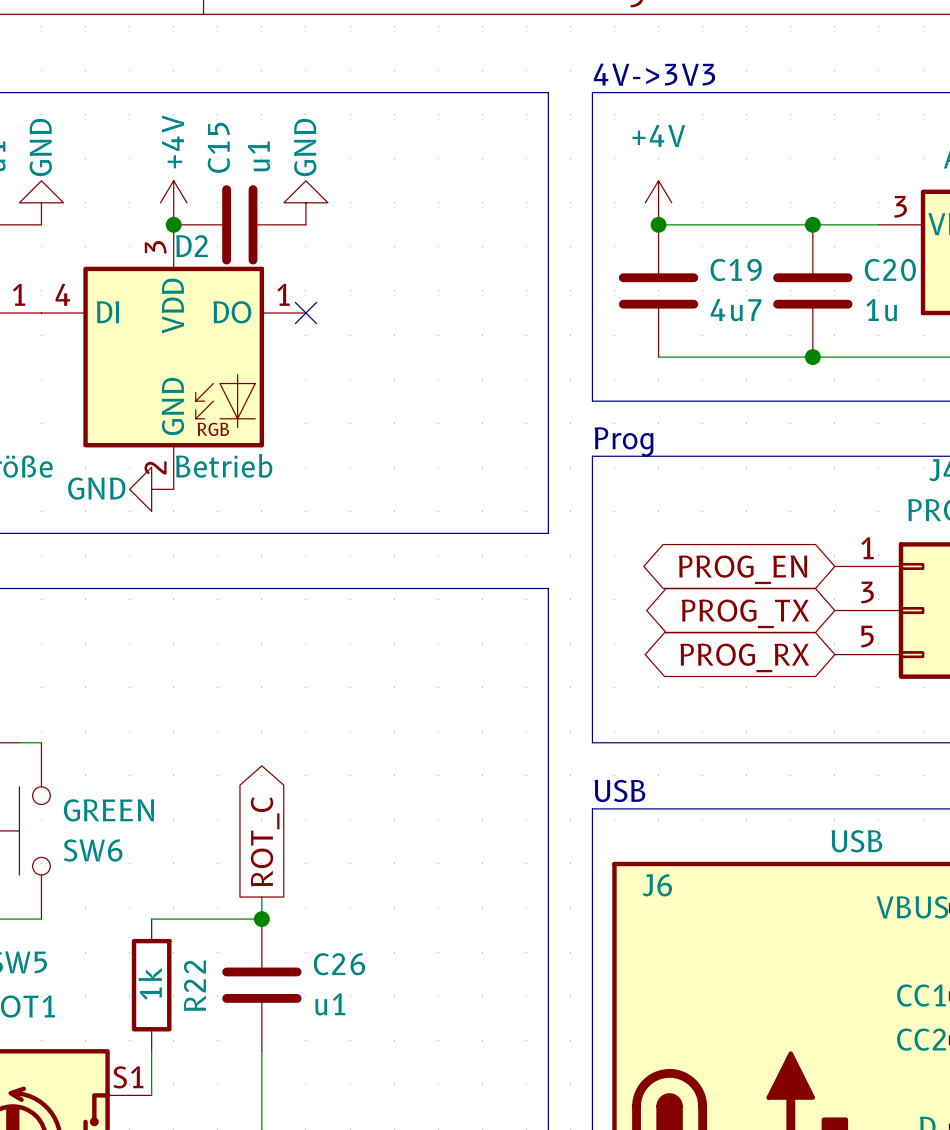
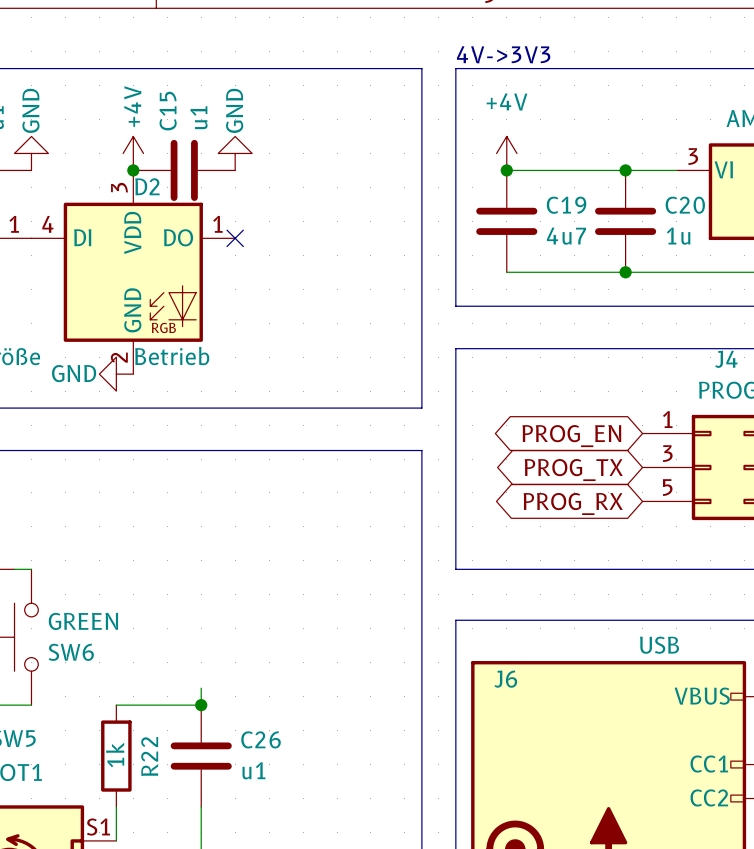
text: Prog (624, 442) -> none
text: USB (619, 790) -> none
global label: ROT_C (265, 841) -> none

